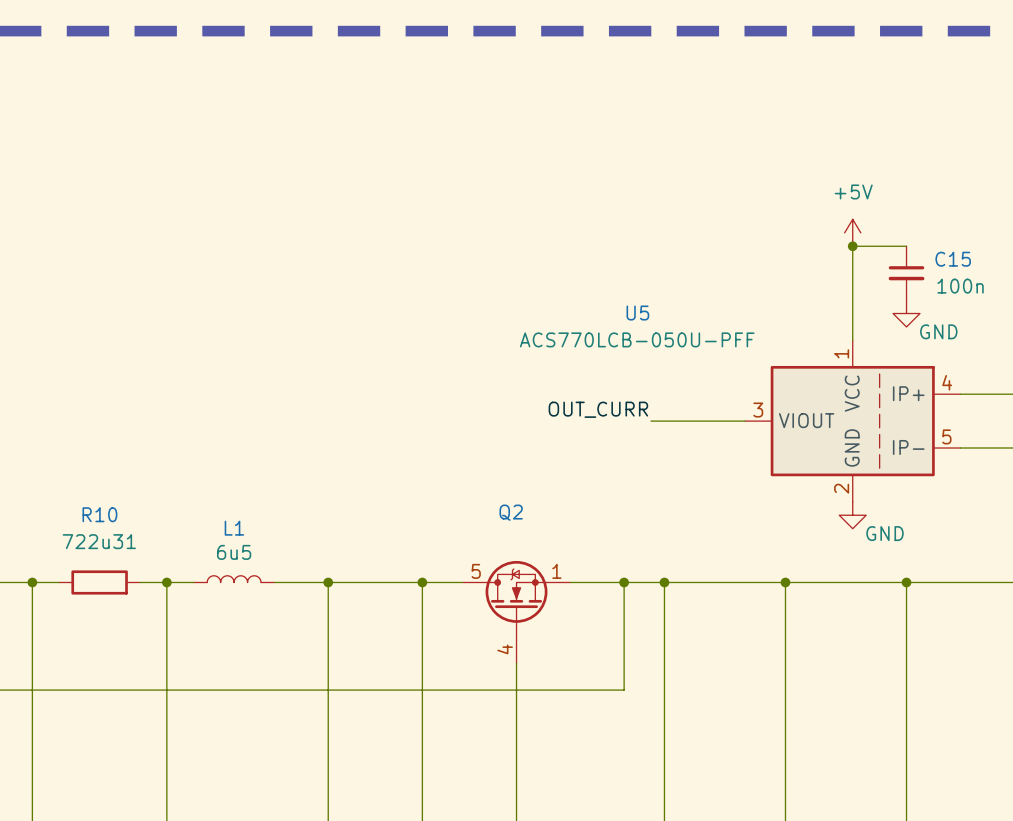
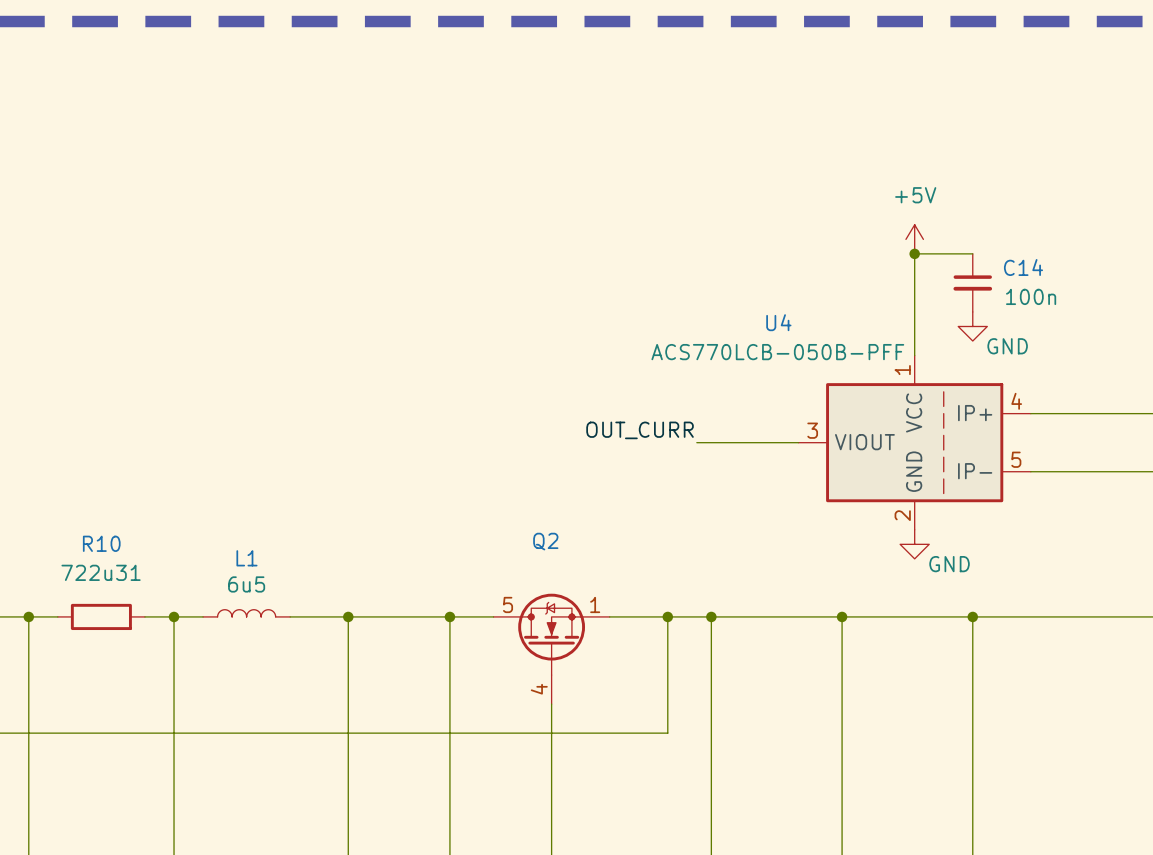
C15 name: C15 (953, 259) -> C14 (1023, 267)
U5 name: U5 (637, 313) -> U4 (778, 322)
U5 value: ACS770LCB-050U-PFF (637, 339) -> ACS770LCB-050B-PFF (777, 352)

